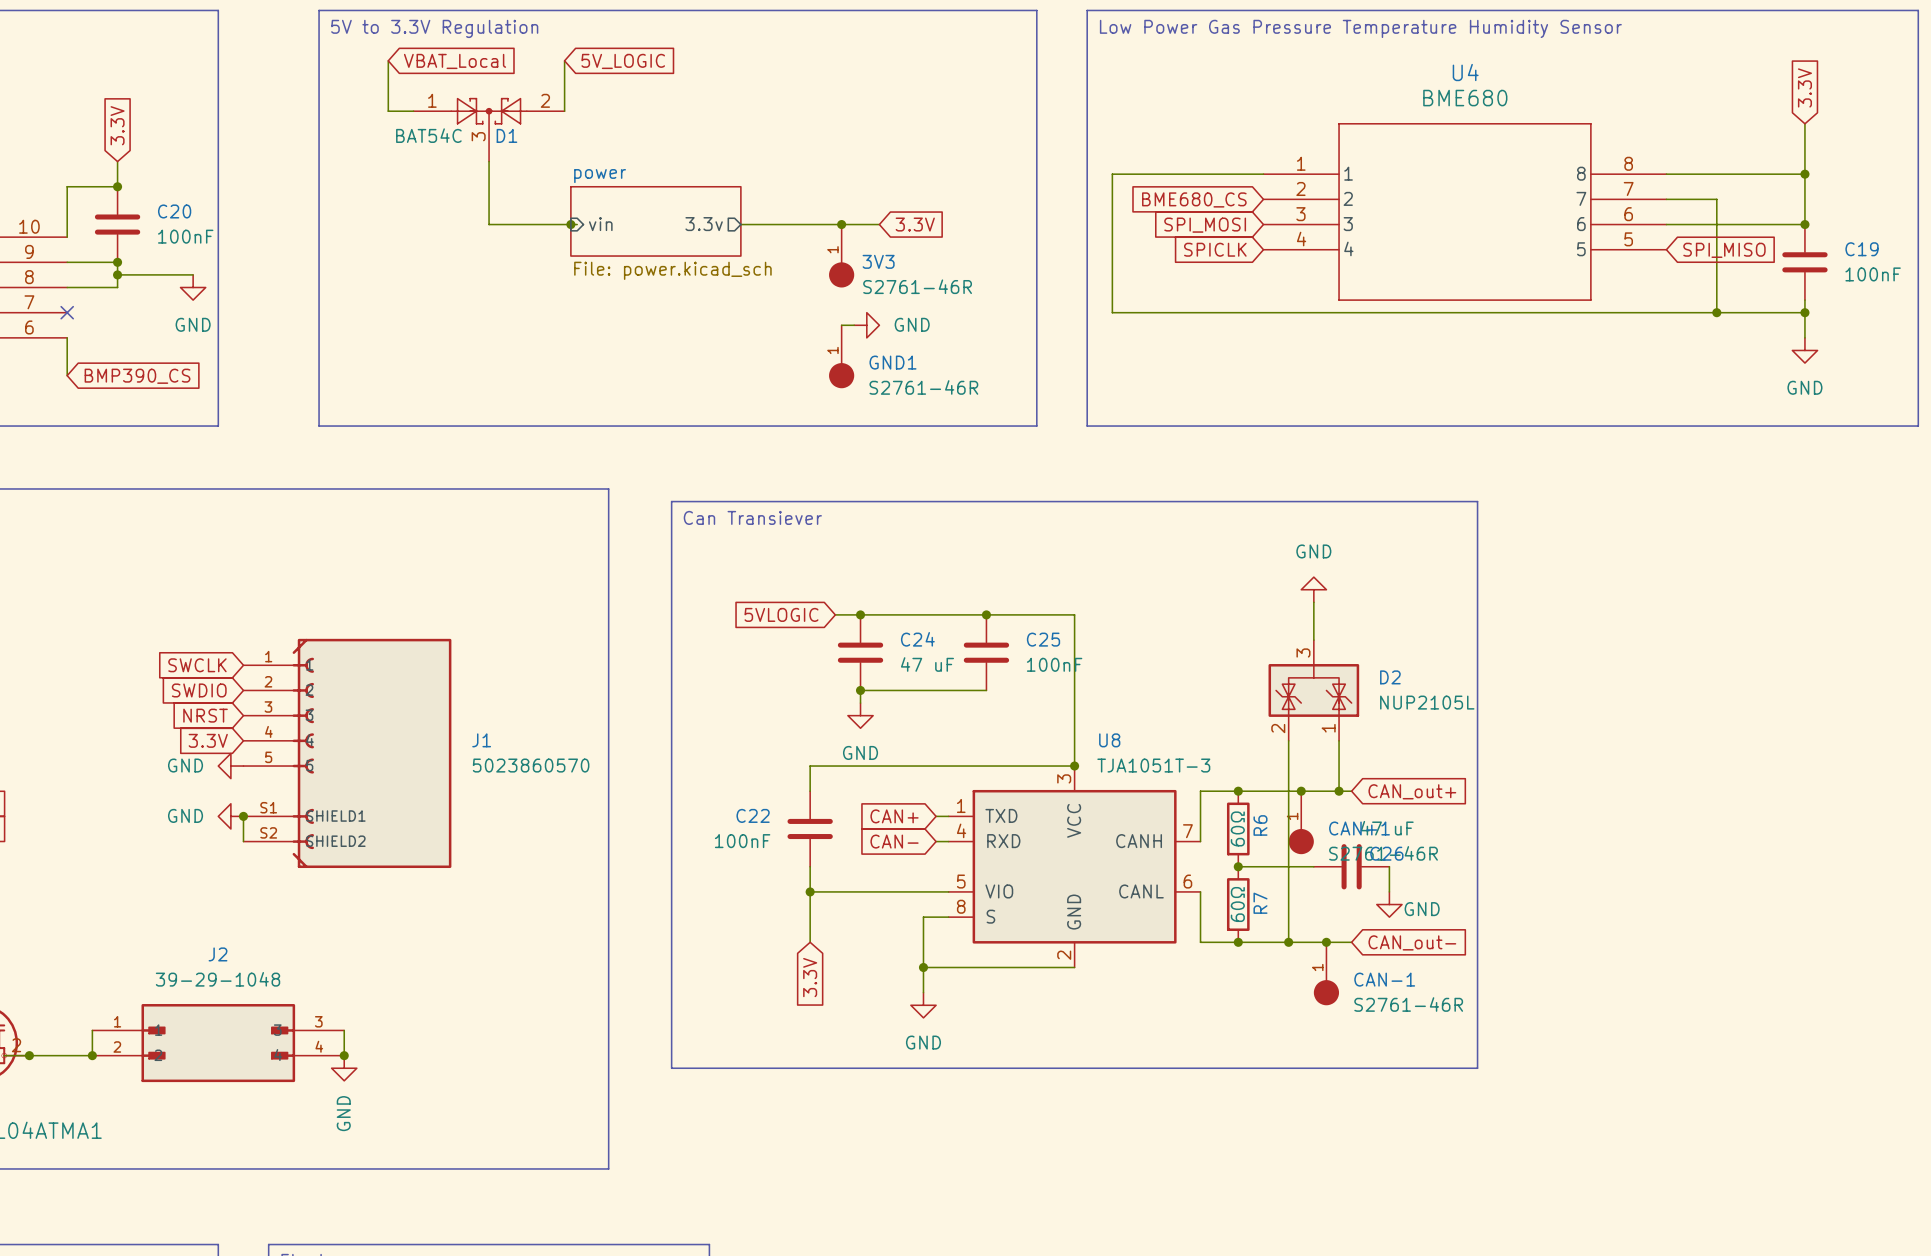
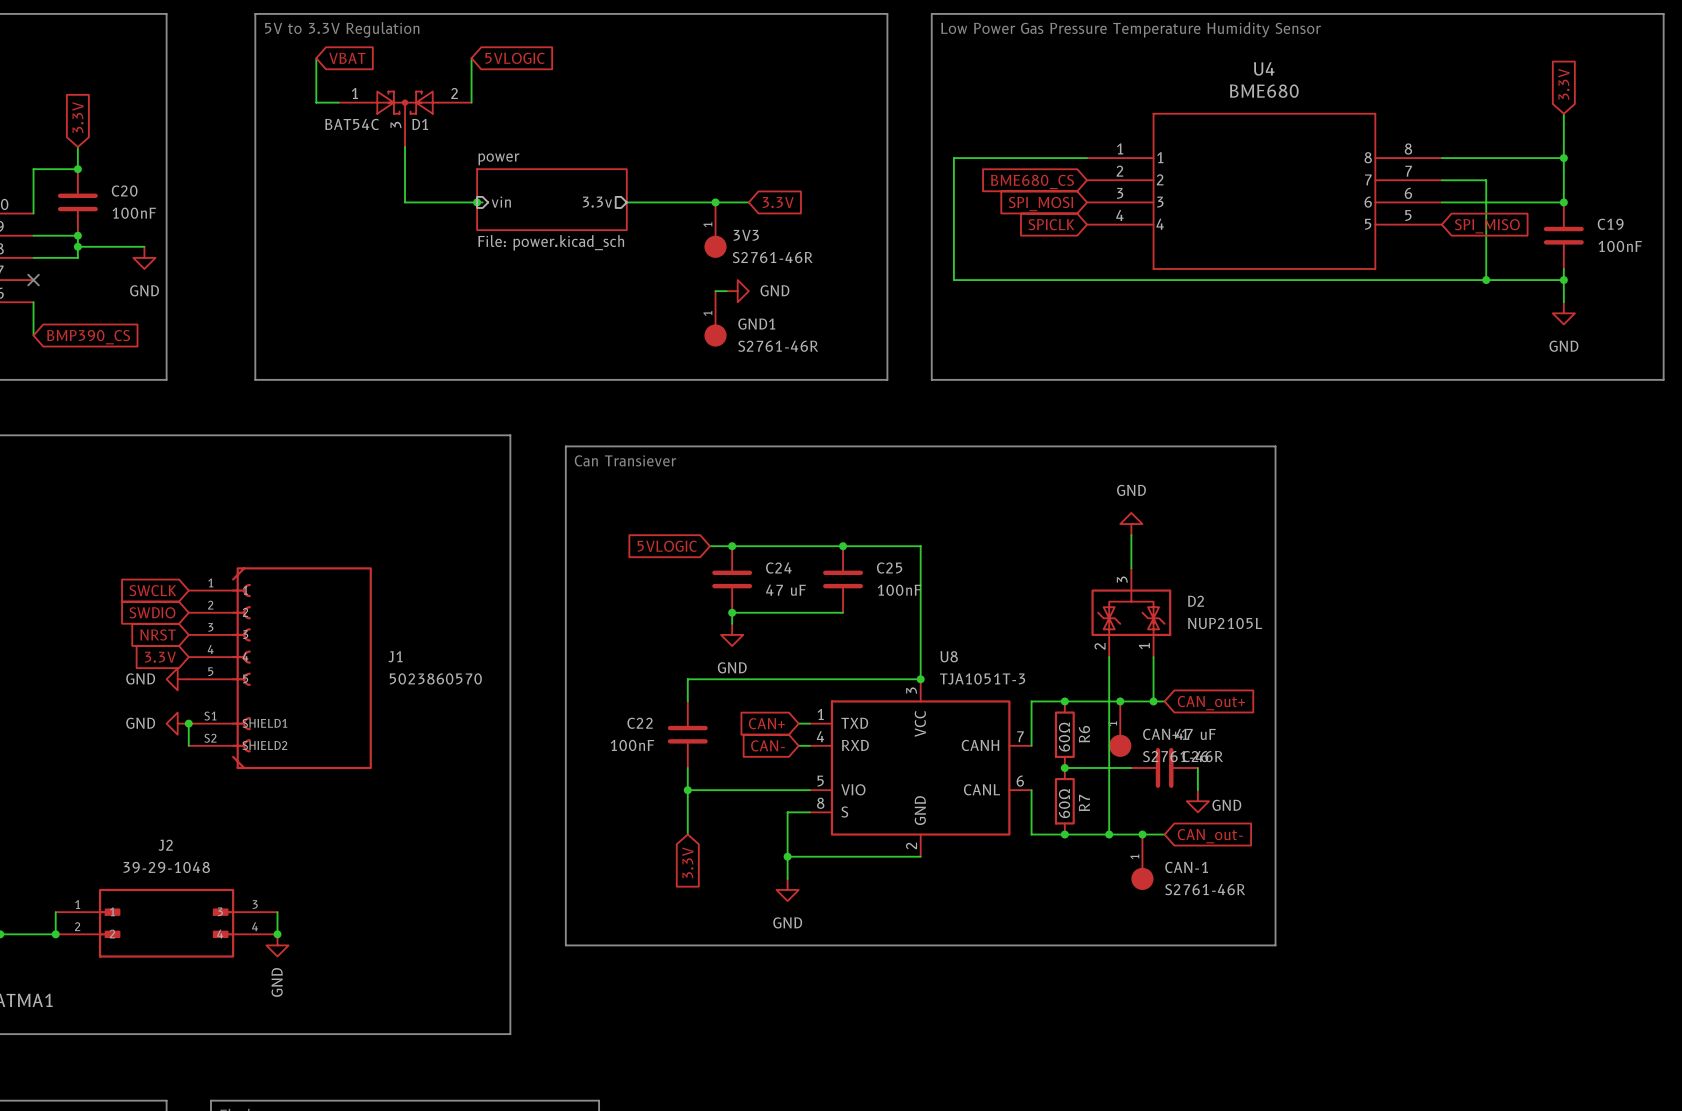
global label: VBAT_Local (455, 61) -> VBAT (347, 58)
global label: 5V_LOGIC (623, 61) -> 5VLOGIC (515, 58)

